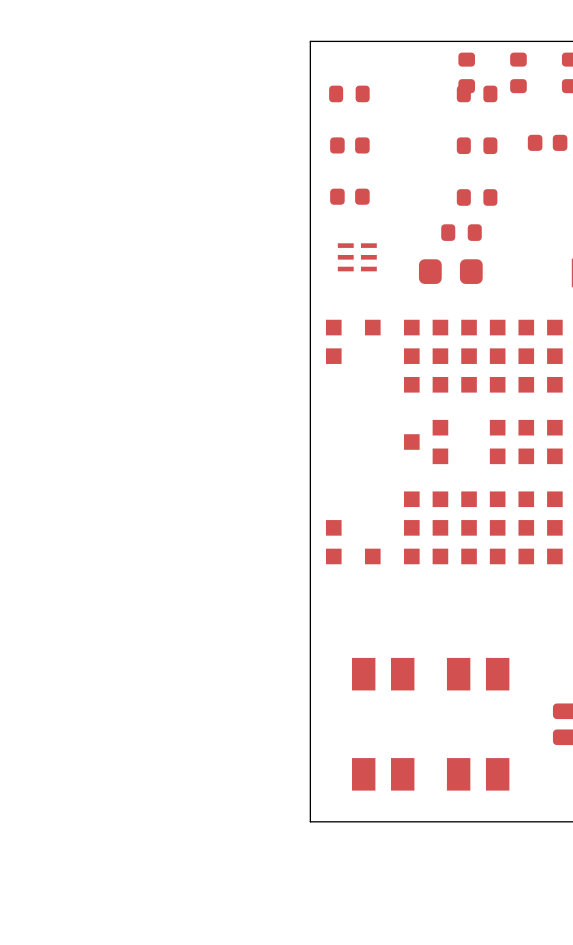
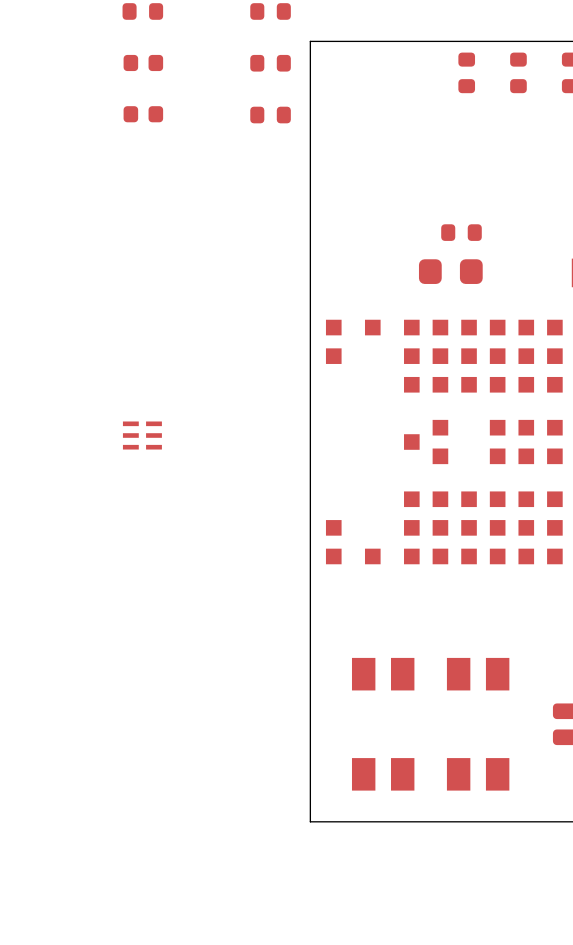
part: none -> (142, 11)
part: none -> (270, 11)
part: none -> (143, 62)
part: none -> (270, 63)
part: (349, 93) -> none
part: (477, 93) -> none
part: none -> (143, 114)
part: none -> (270, 115)
part: (547, 142) -> none
part: (349, 145) -> none
part: (477, 145) -> none
part: (349, 196) -> none
part: (477, 197) -> none
part position: (357, 257) -> (142, 435)

